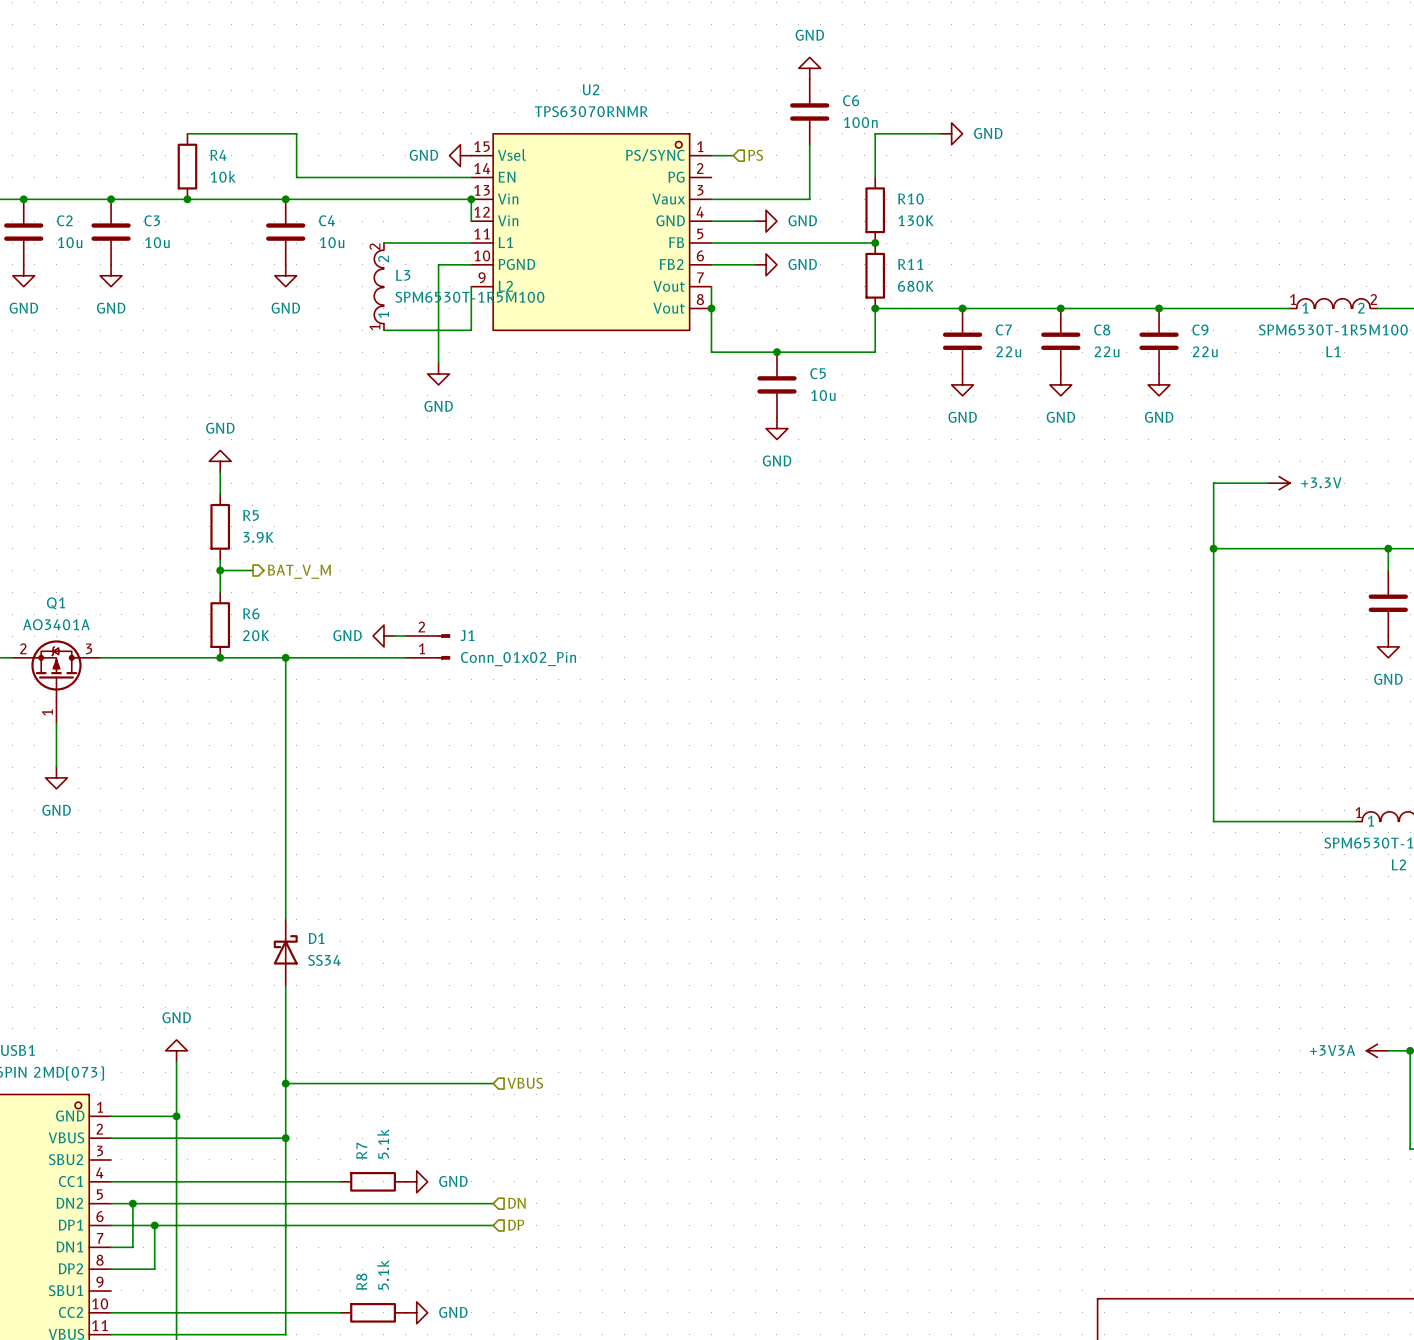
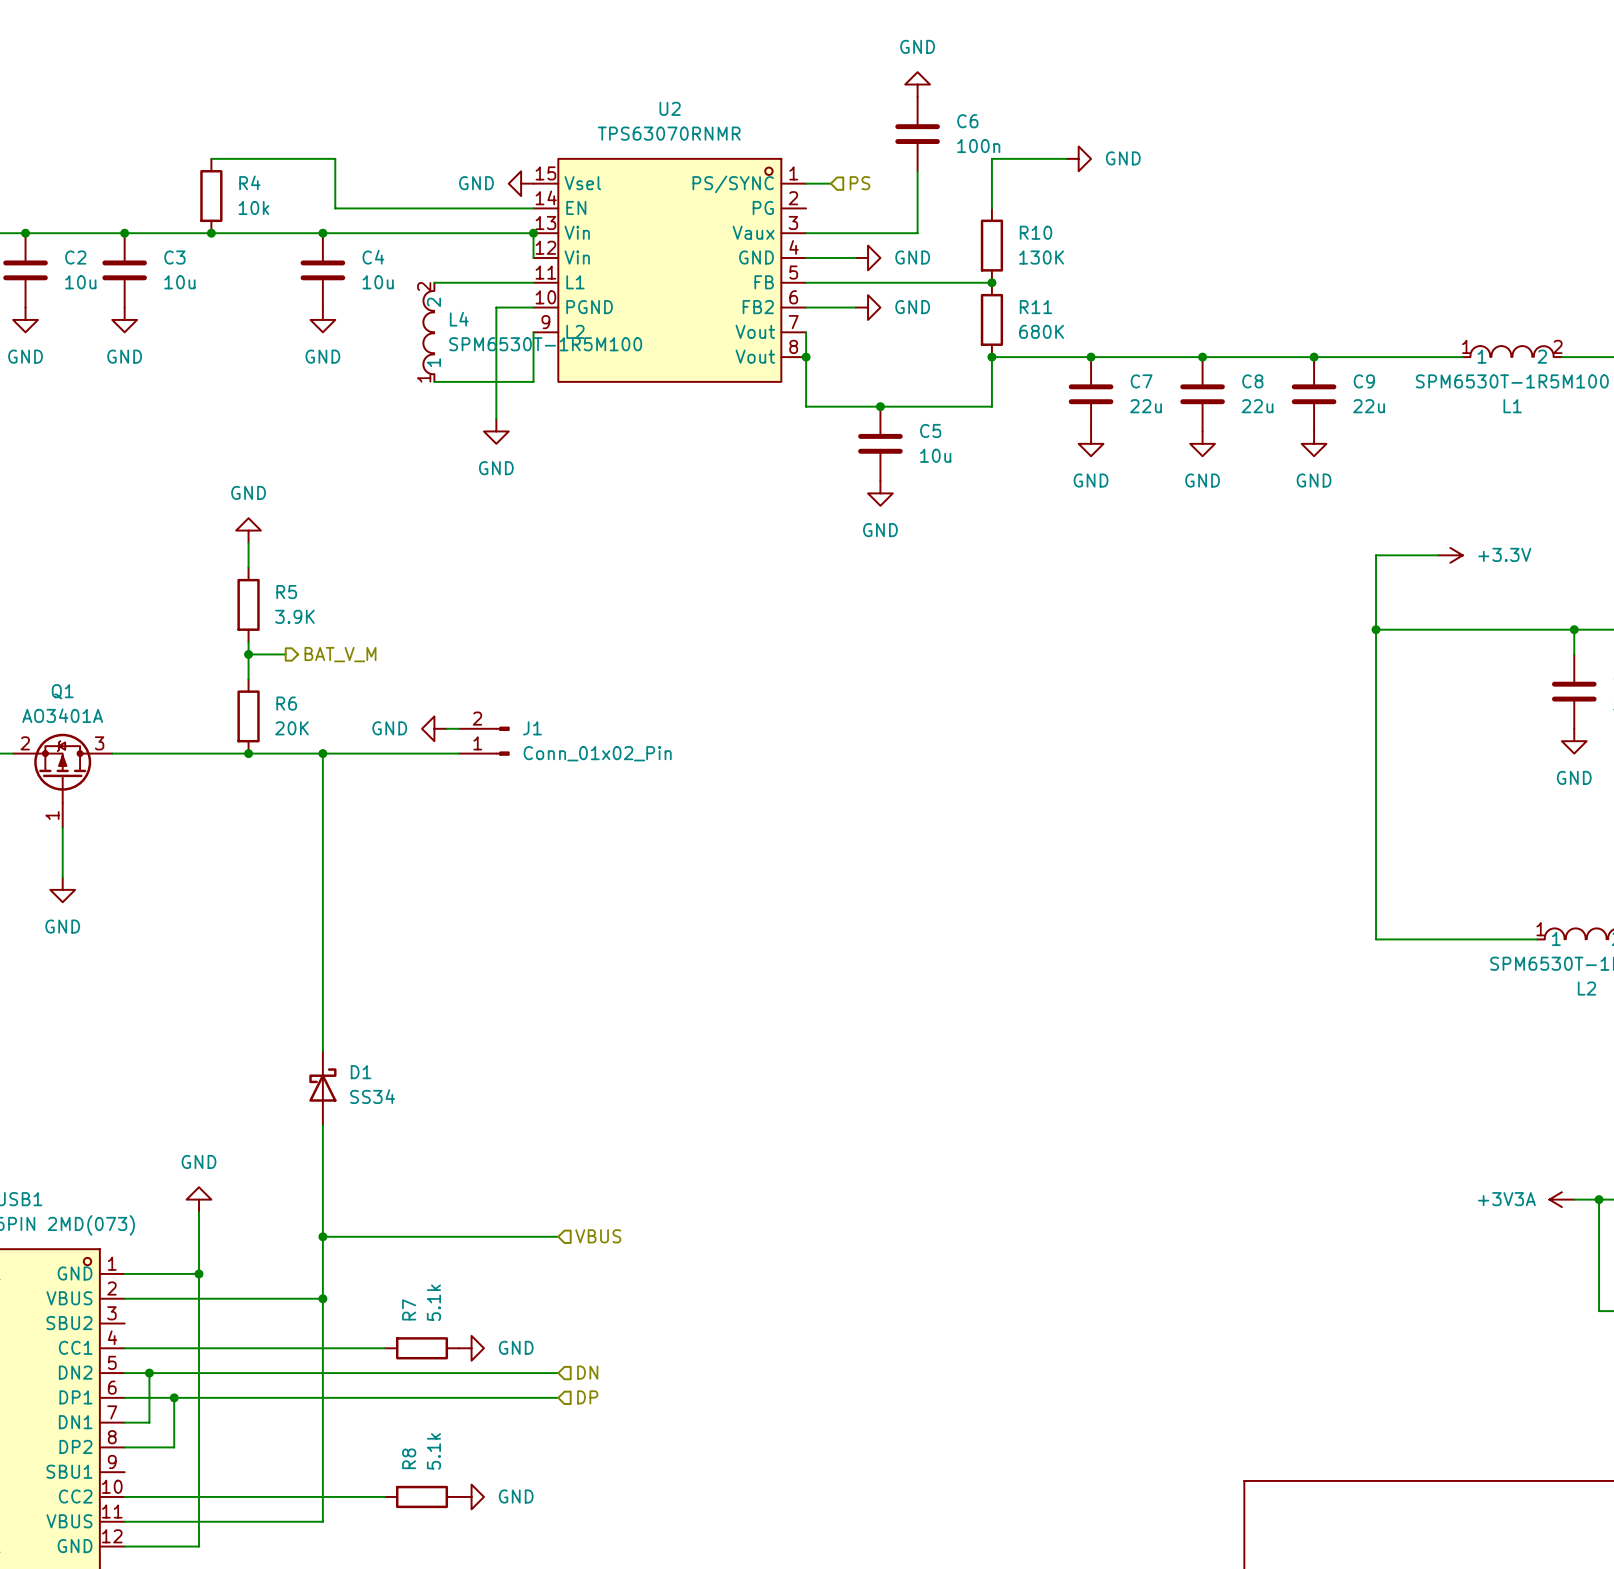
L3 name: L3 (403, 275) -> L4 (459, 319)

